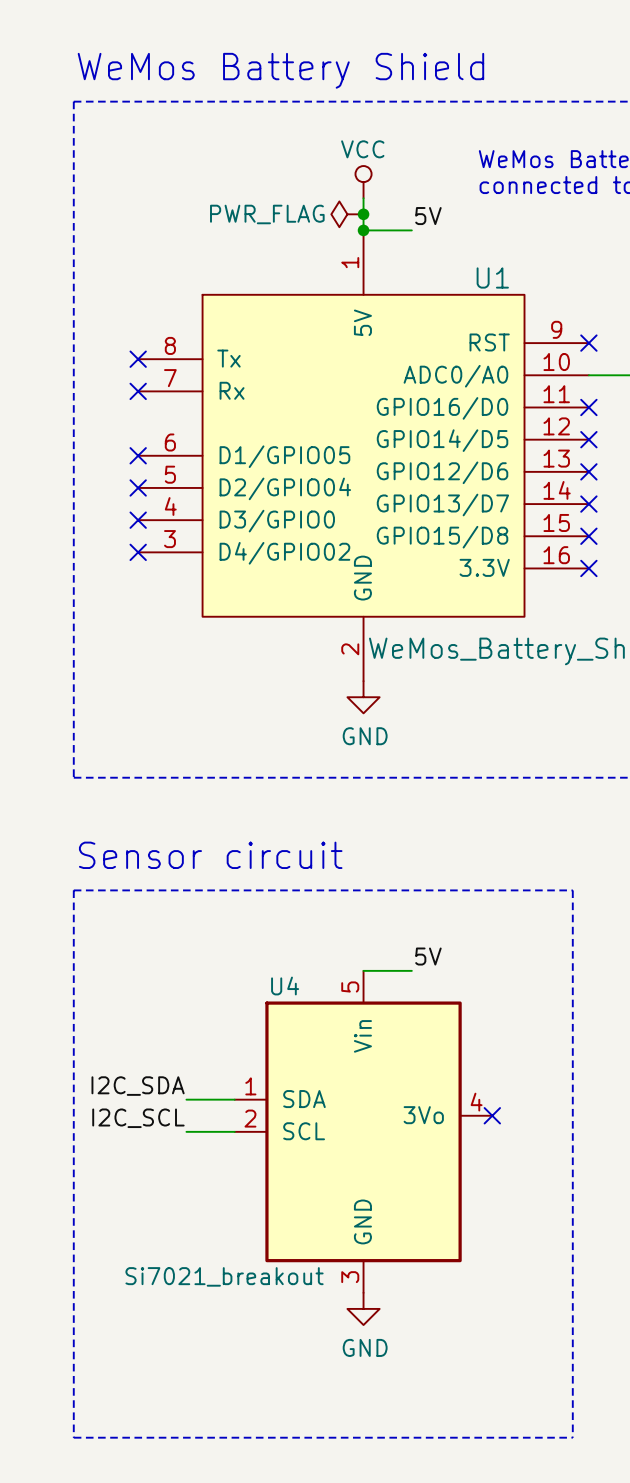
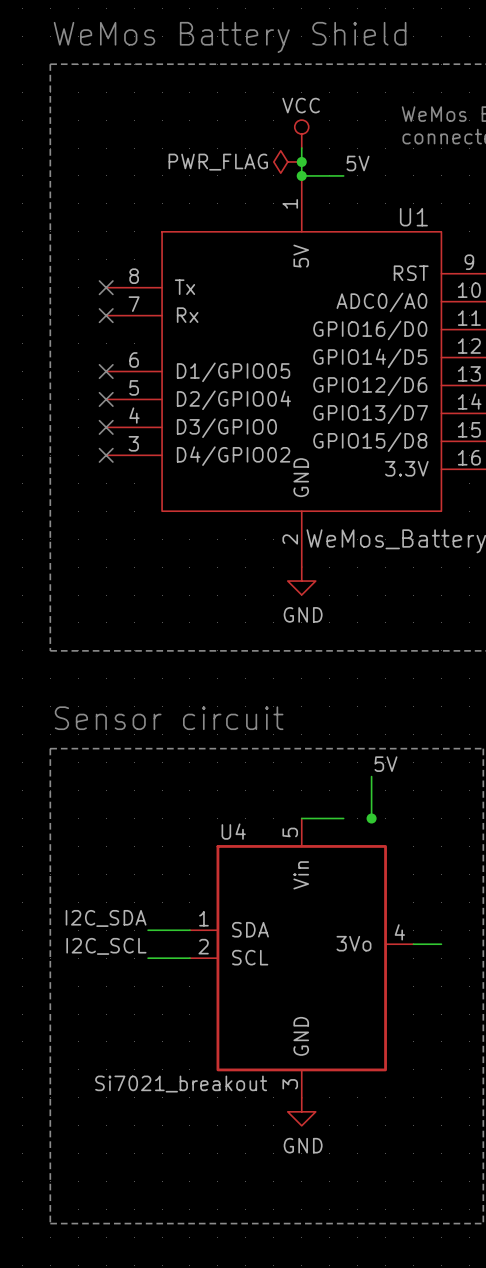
wire: none -> (371, 776) (371, 818)
label position: 5V (428, 956) -> 5V (385, 764)
junction: none -> (371, 818)
wire: none -> (413, 944) (441, 944)
no-connect mark: (492, 1115) -> none

